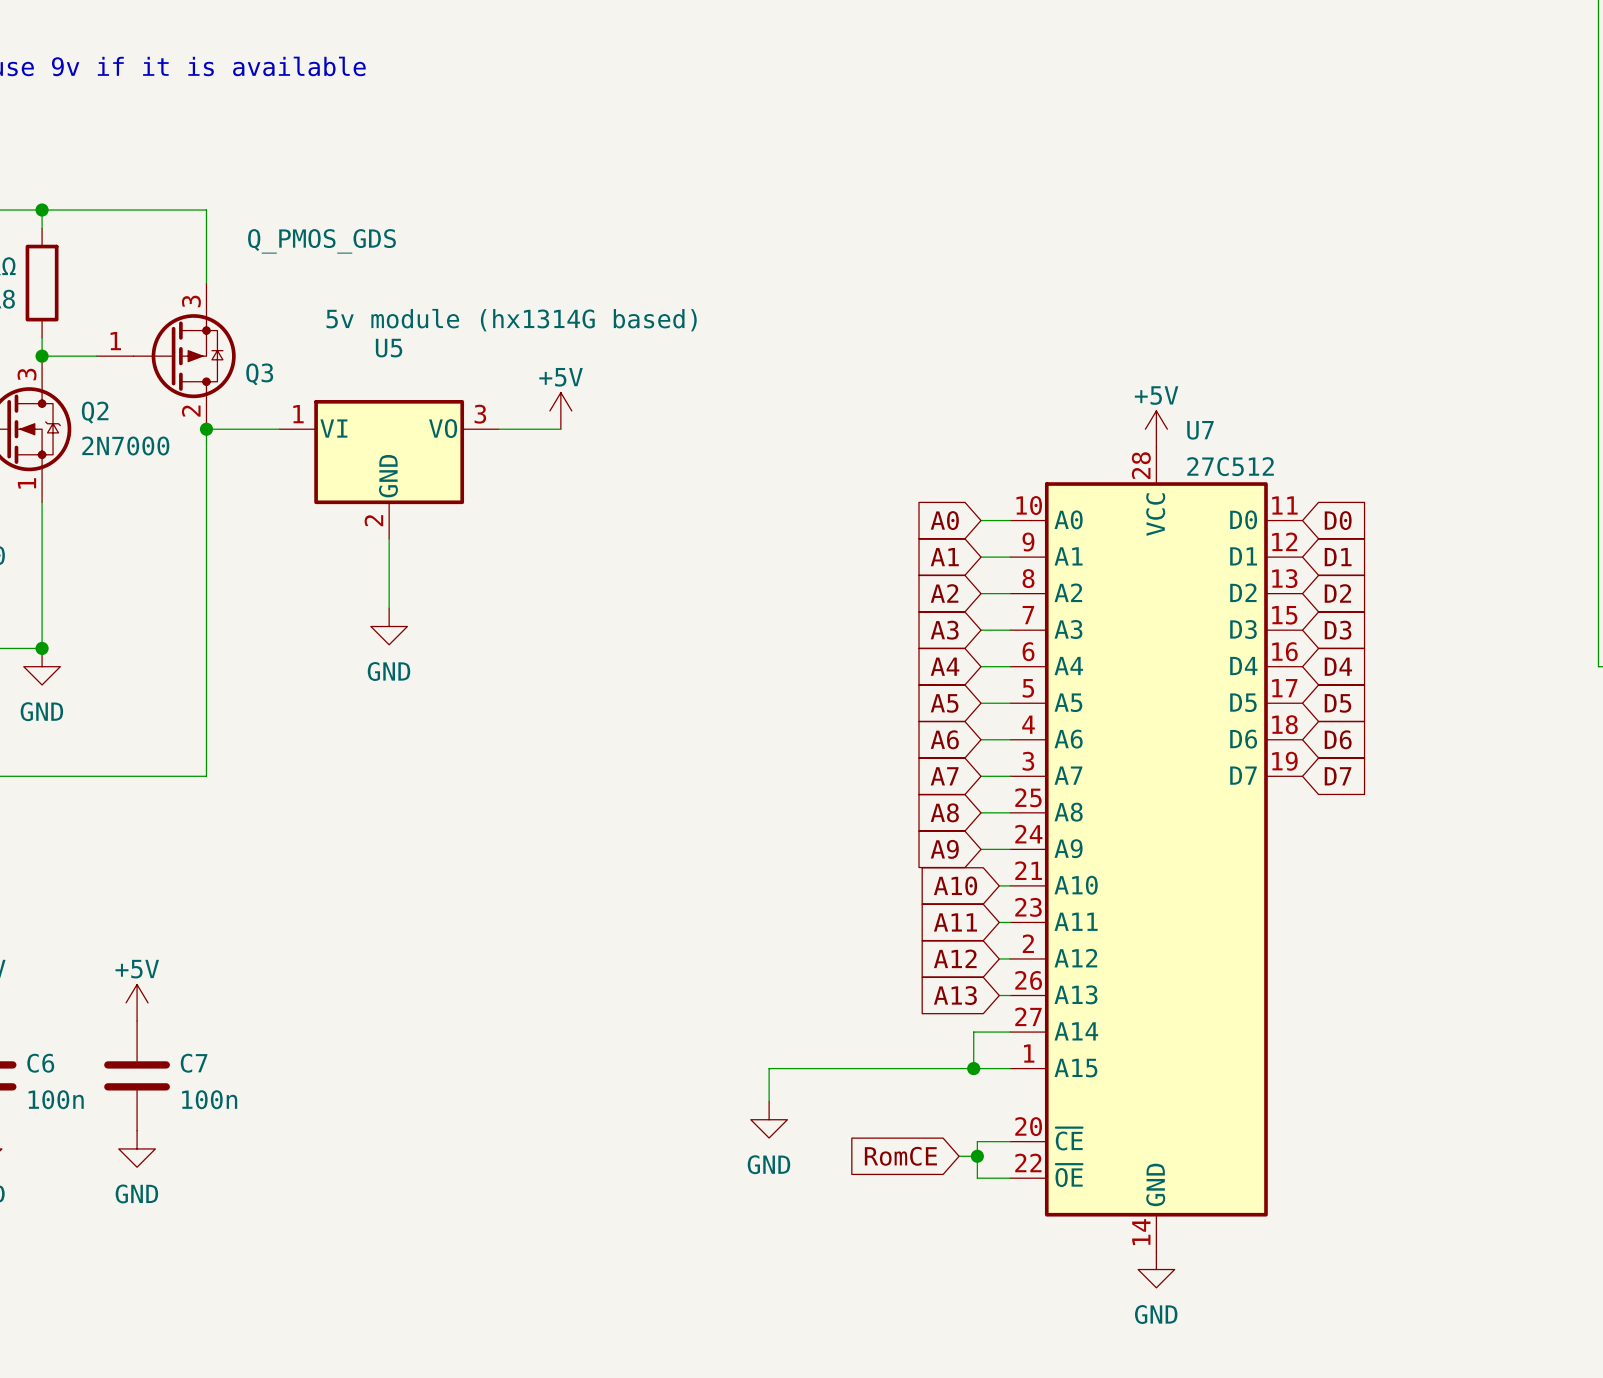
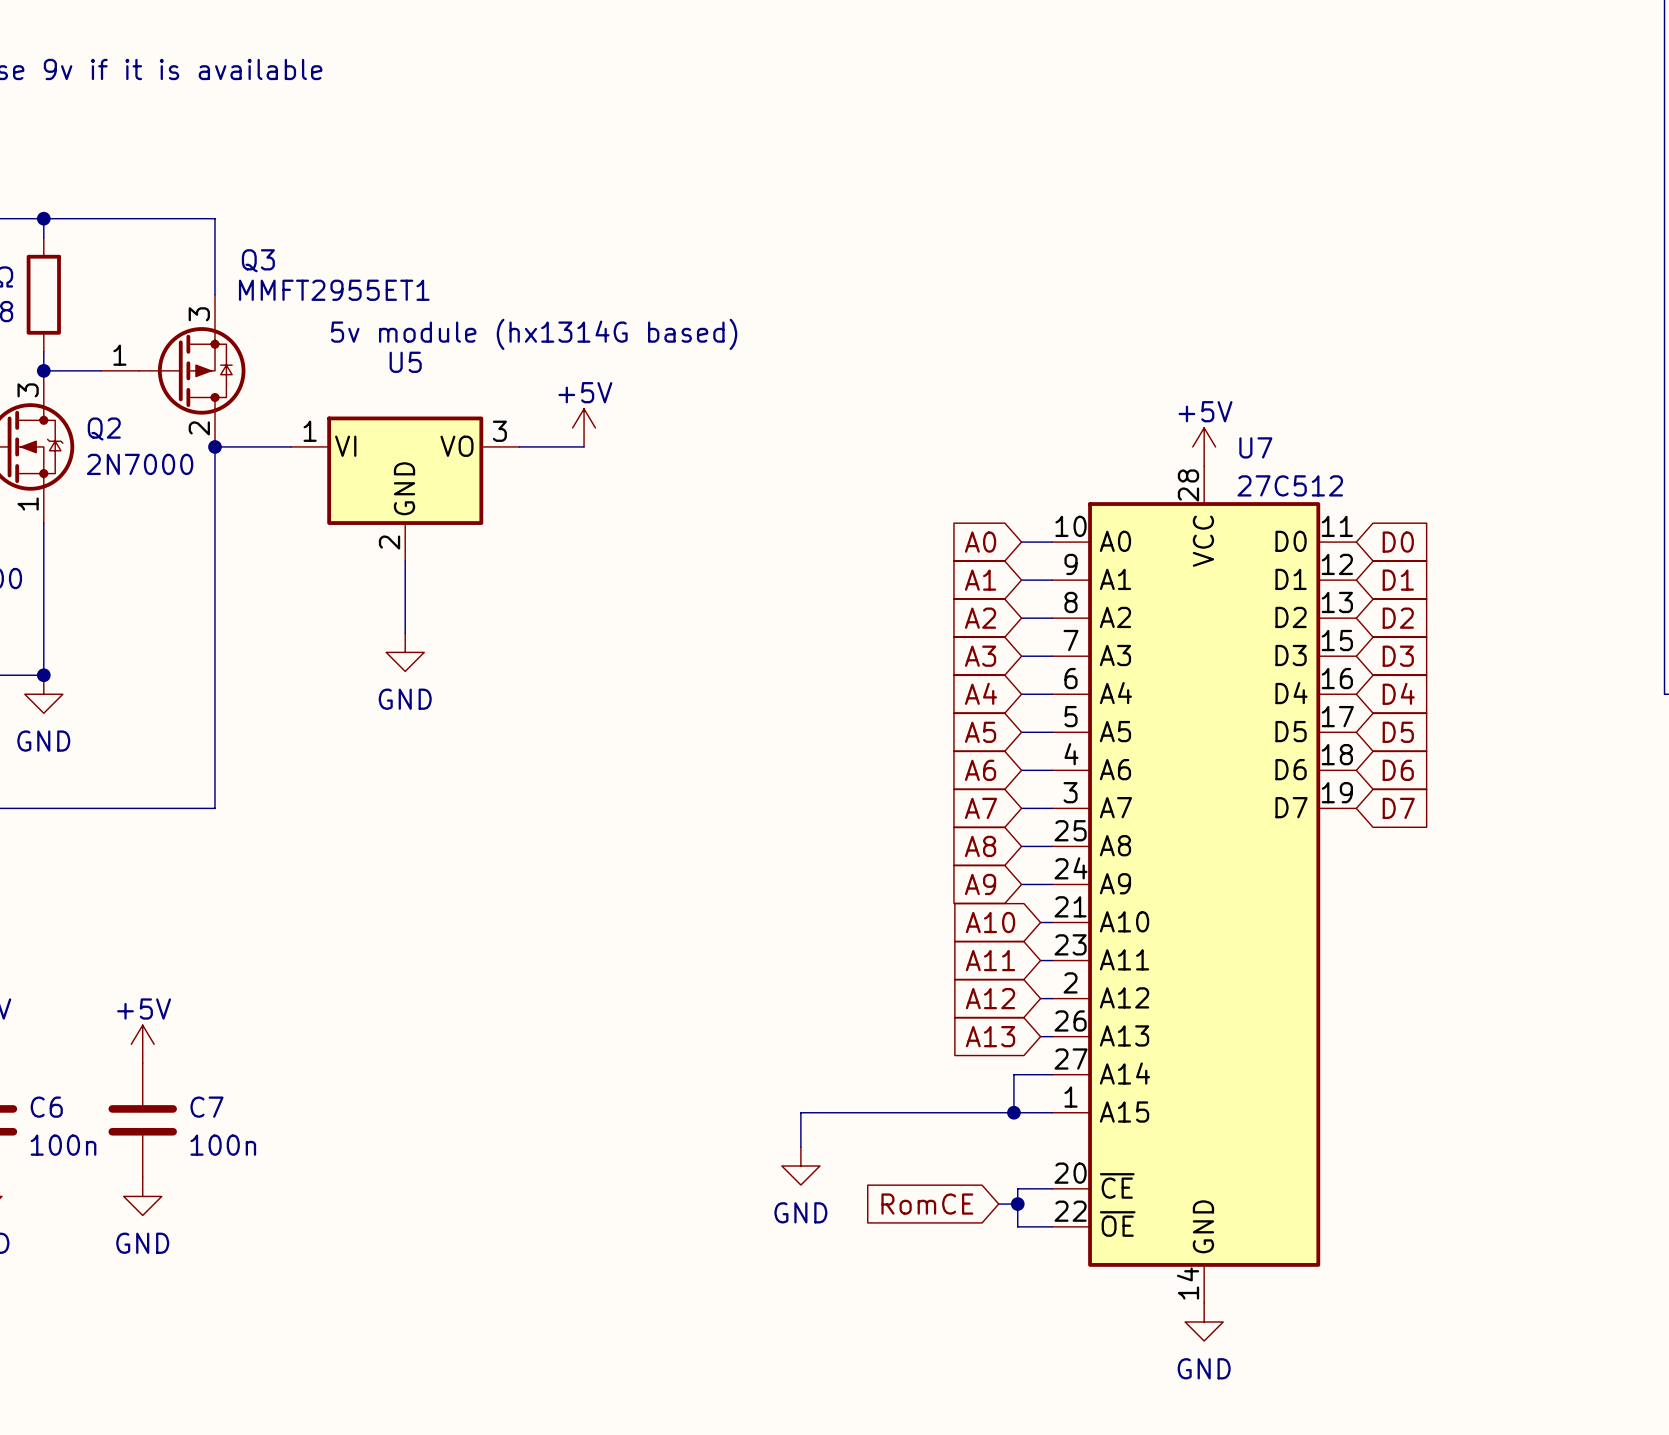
Q3 value: Q_PMOS_GDS (321, 241) -> MMFT2955ET1 (334, 290)
Q3 name position: Q3 (259, 374) -> Q3 (258, 260)

